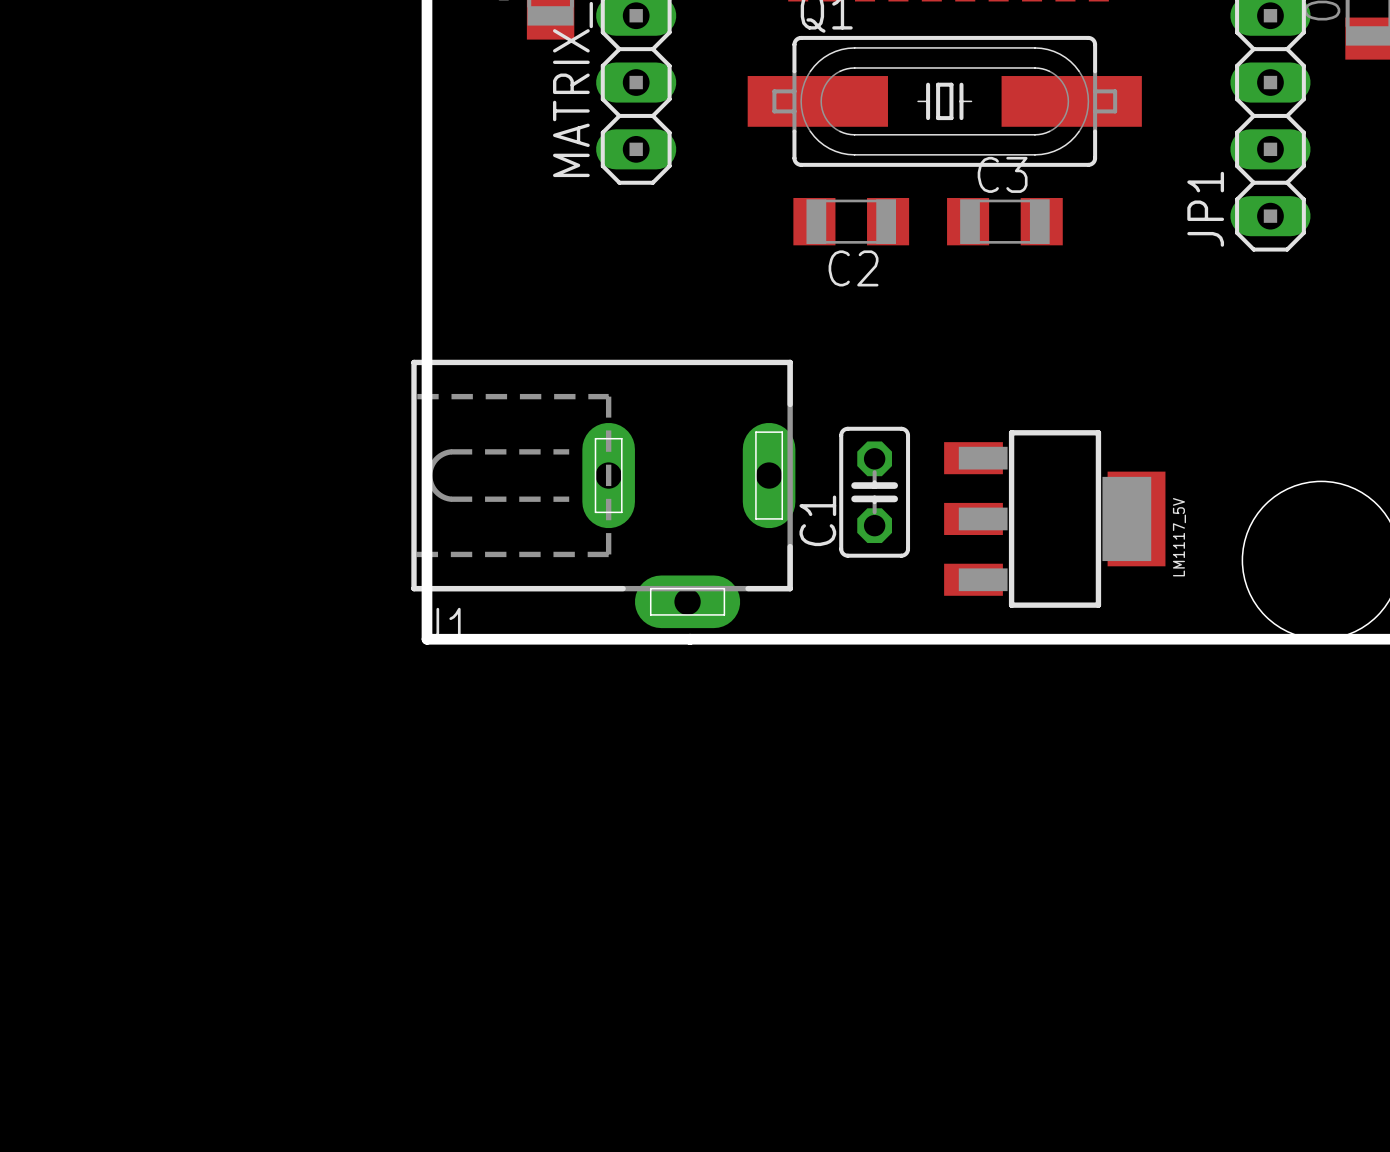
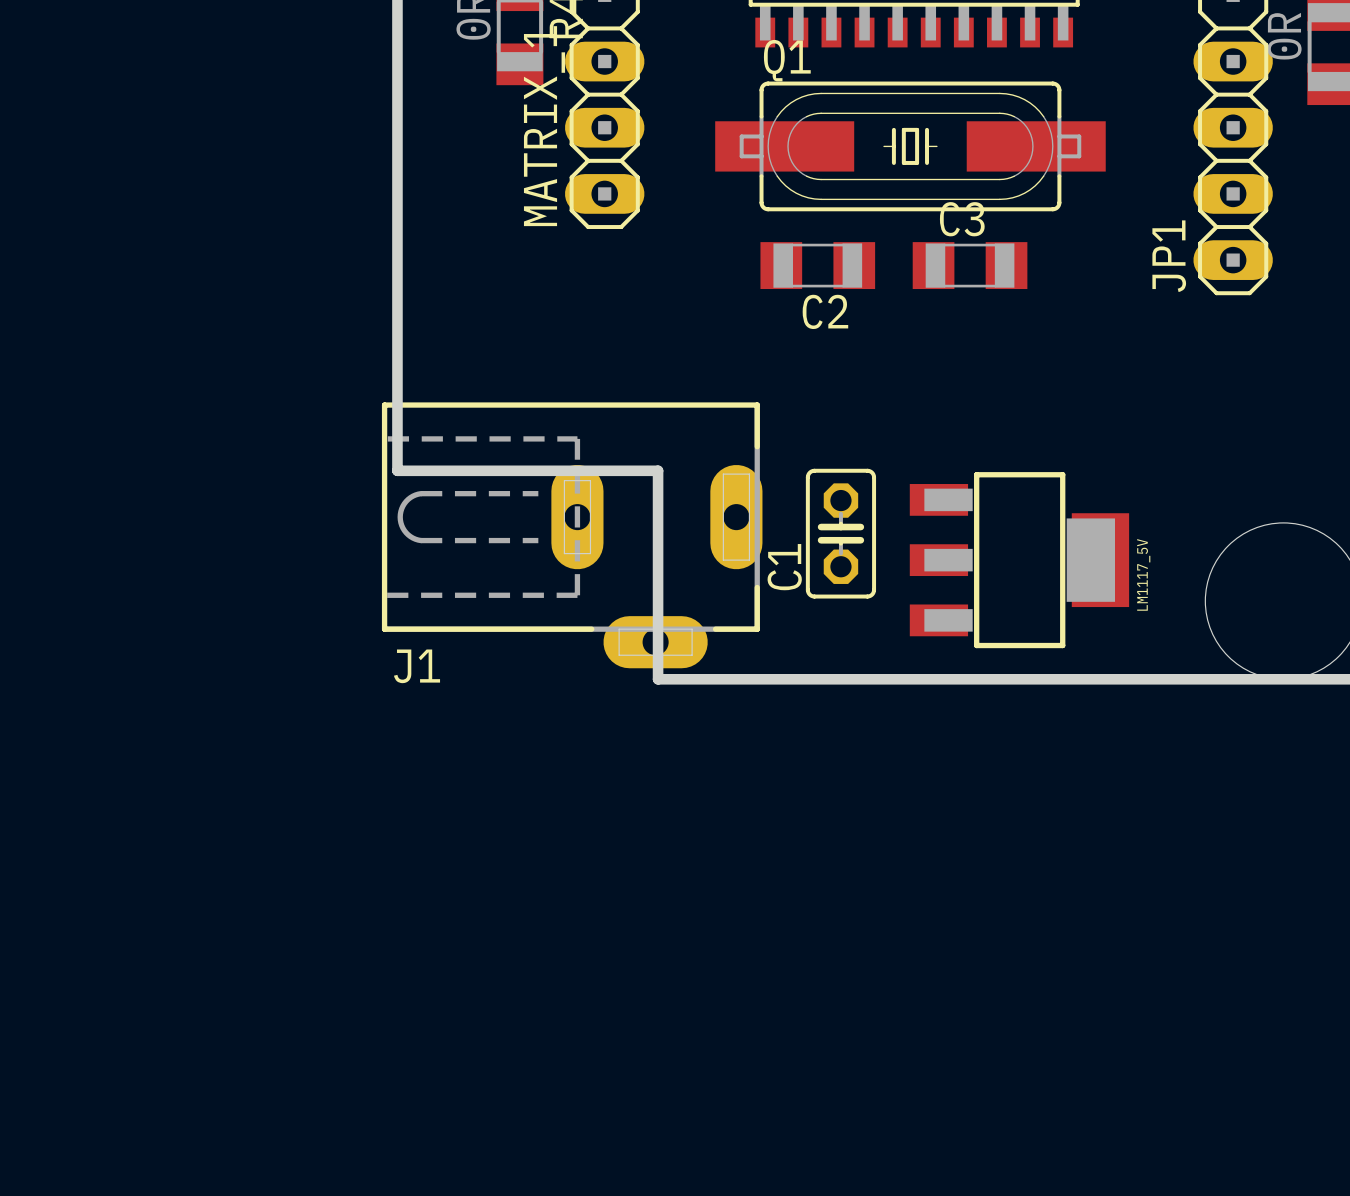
board edge: (426, 428) (426, 639) (690, 639) -> (397, 470) (658, 470) (658, 679)

